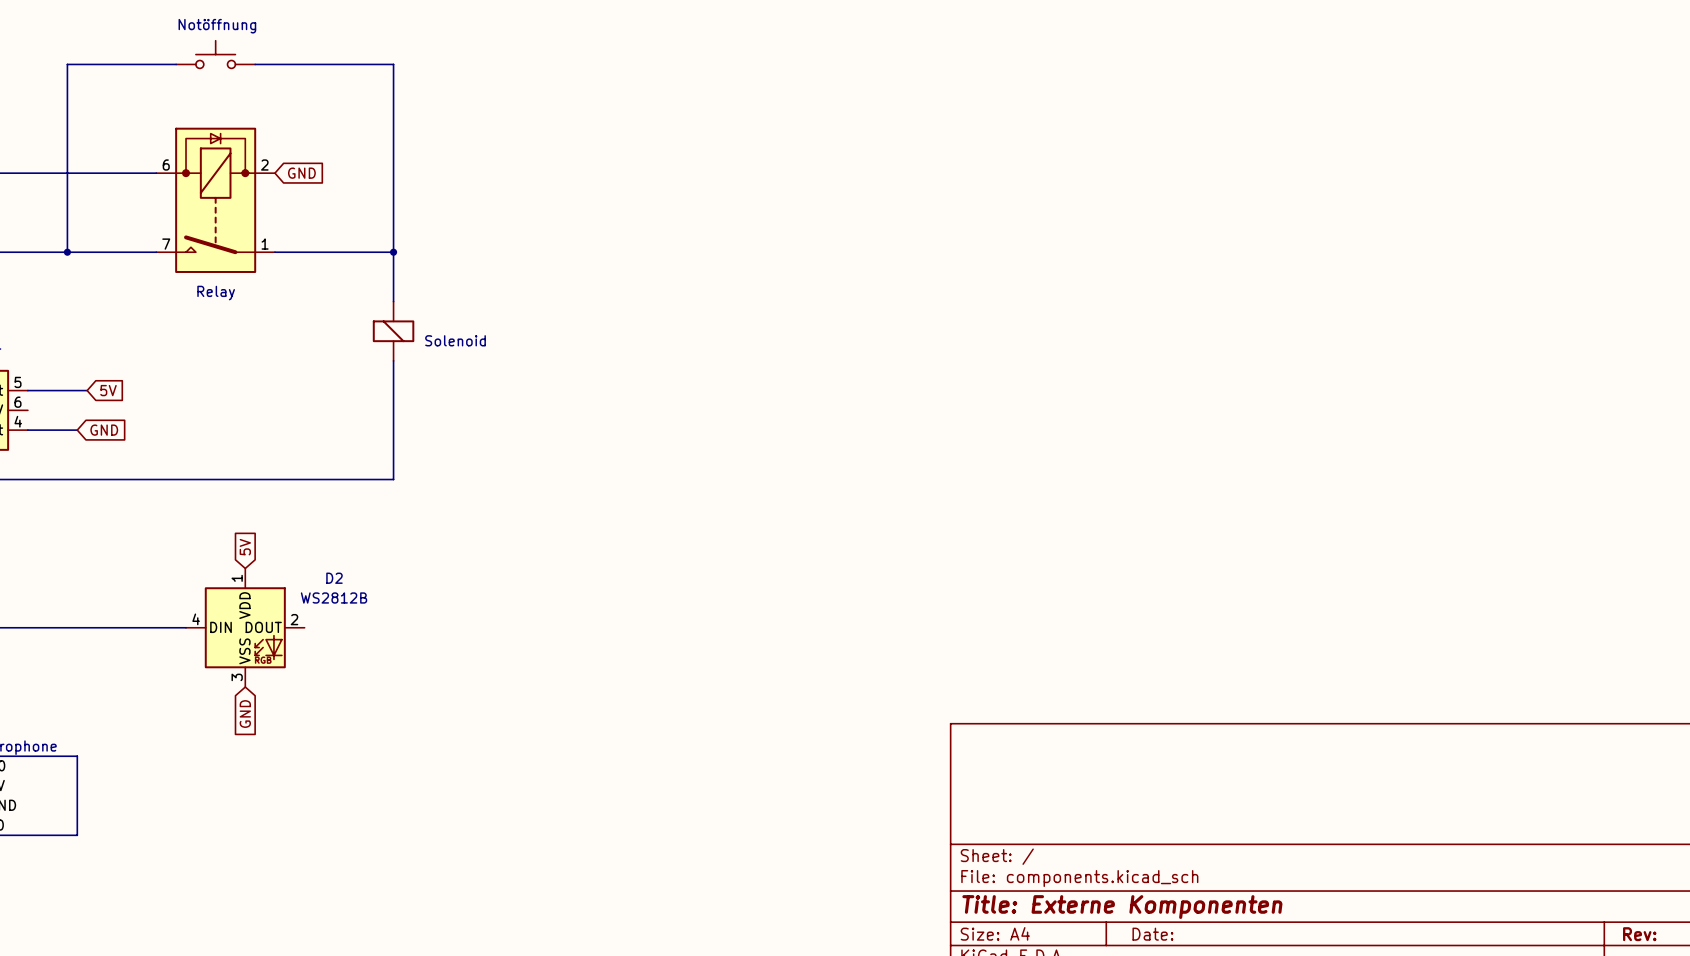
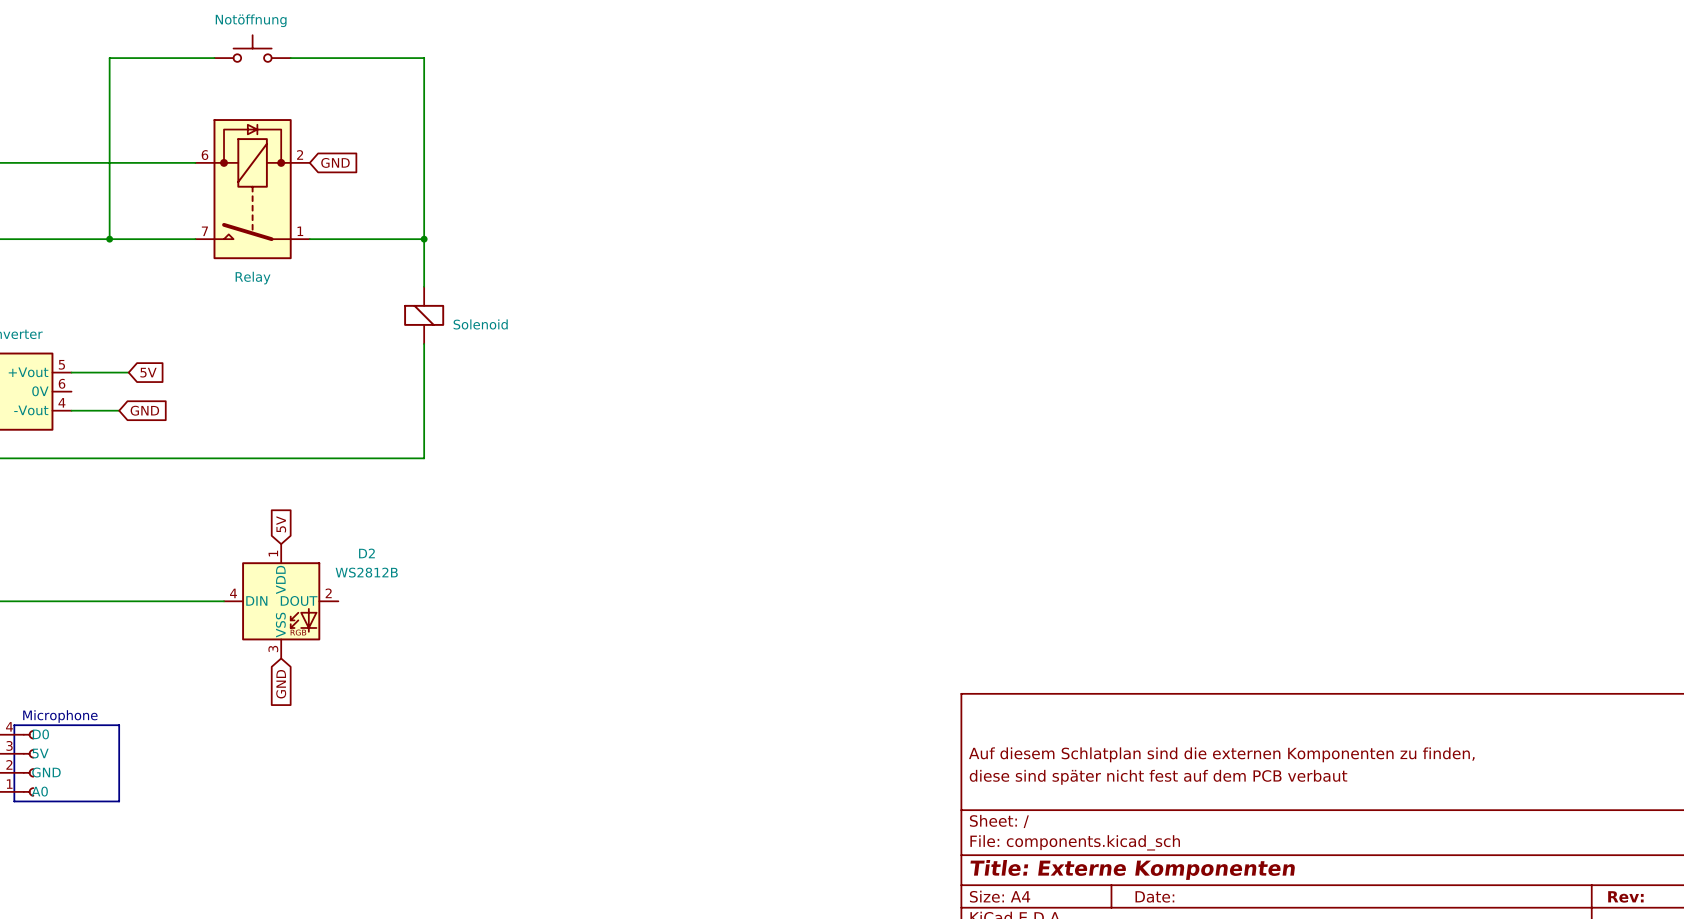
title block: none -> Auf diesem Schlatplan sind die externen Komponenten zu finden, (1221, 754)
title block: none -> diese sind später nicht fest auf dem PCB verbaut (1158, 777)

